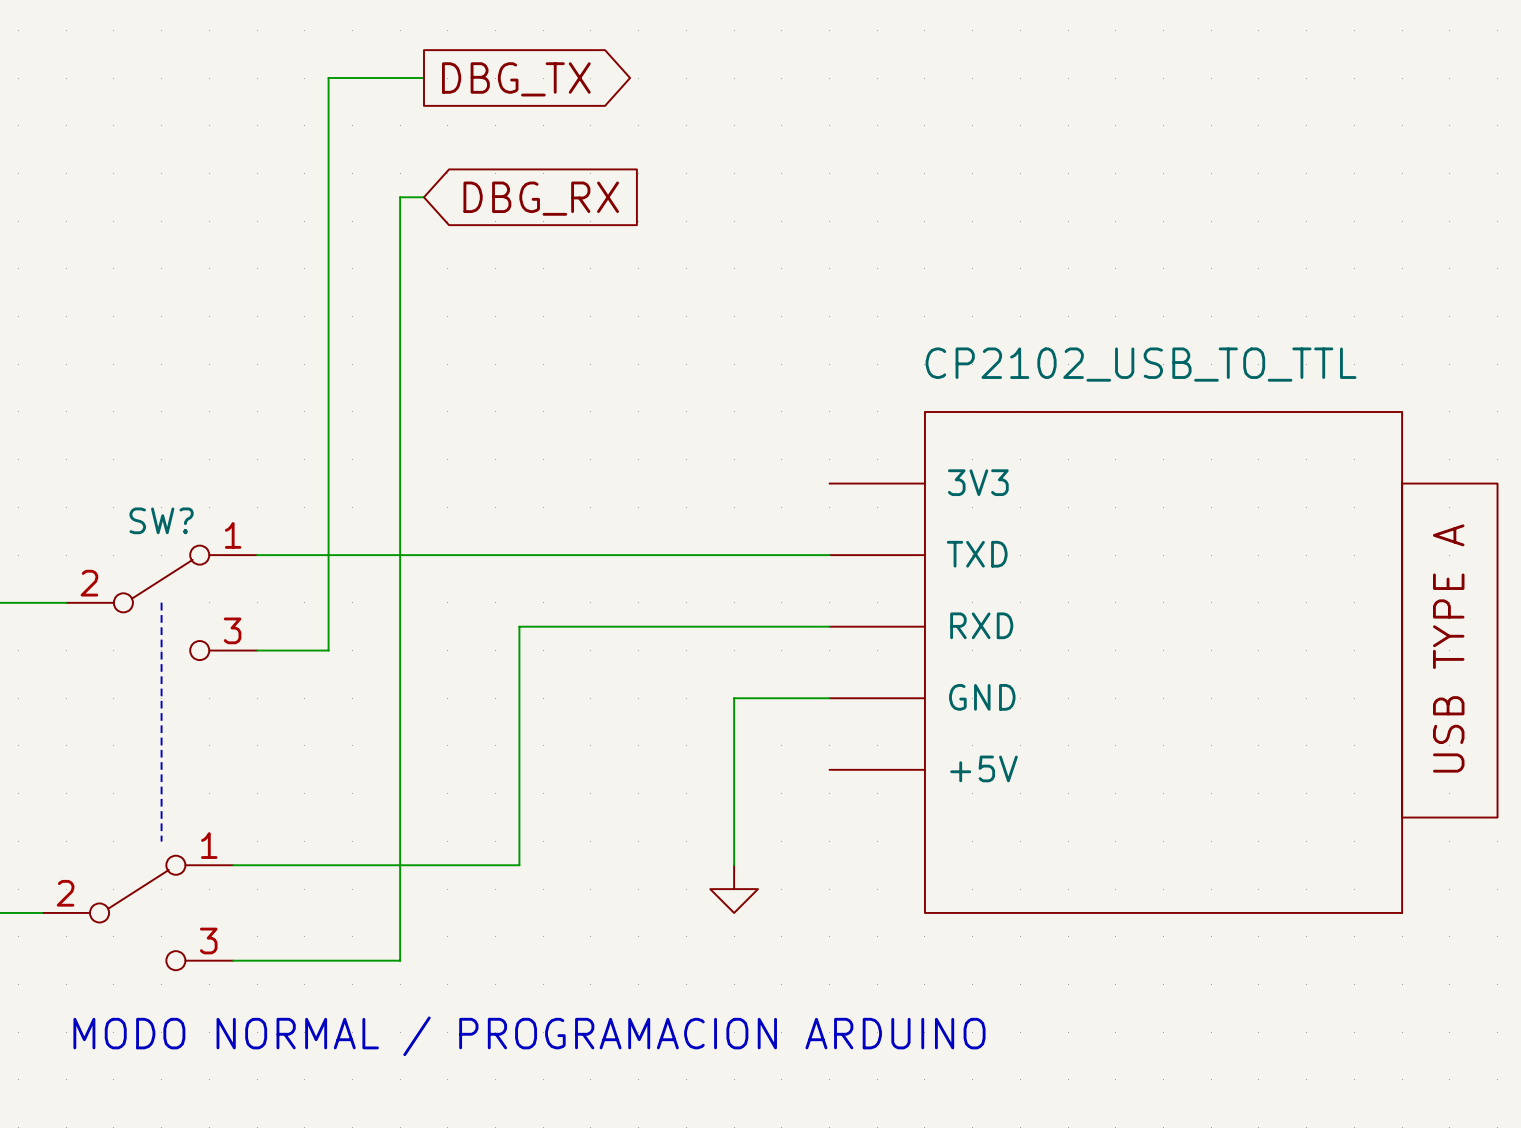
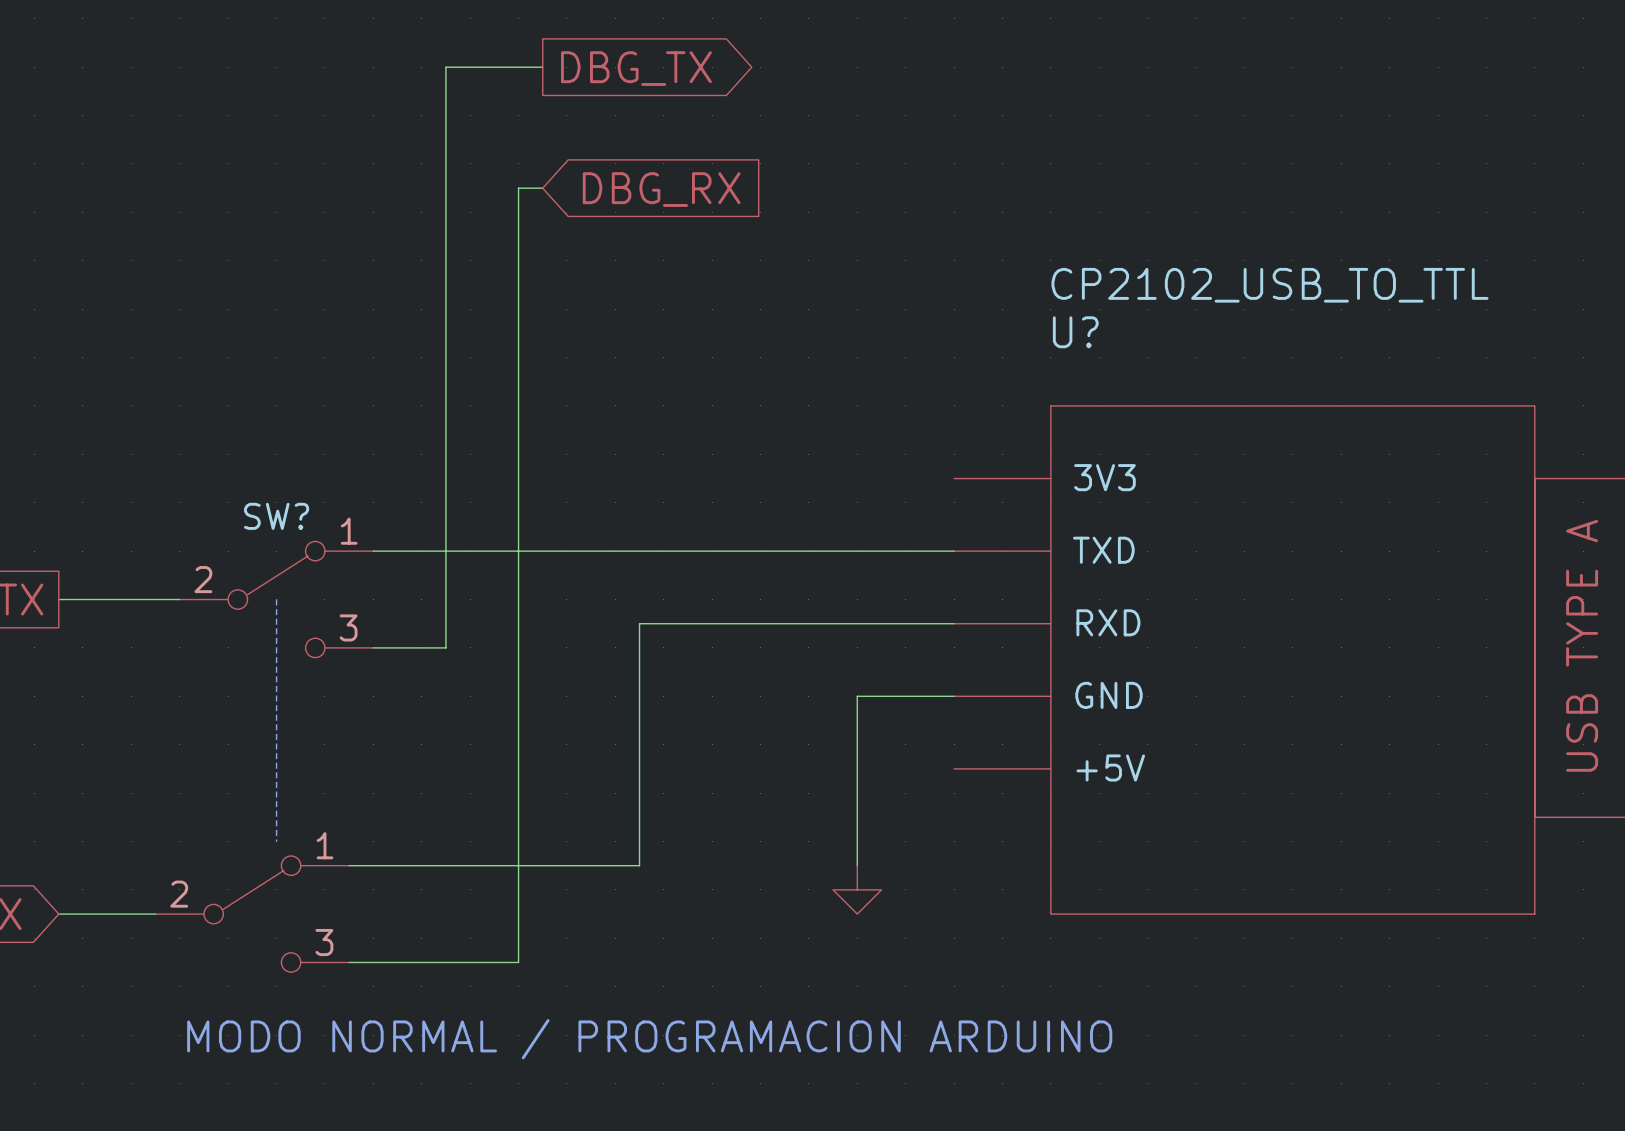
U? name: none -> U? (1075, 332)
U? value position: CP2102_USB_TO_TTL (1141, 364) -> CP2102_USB_TO_TTL (1270, 285)

